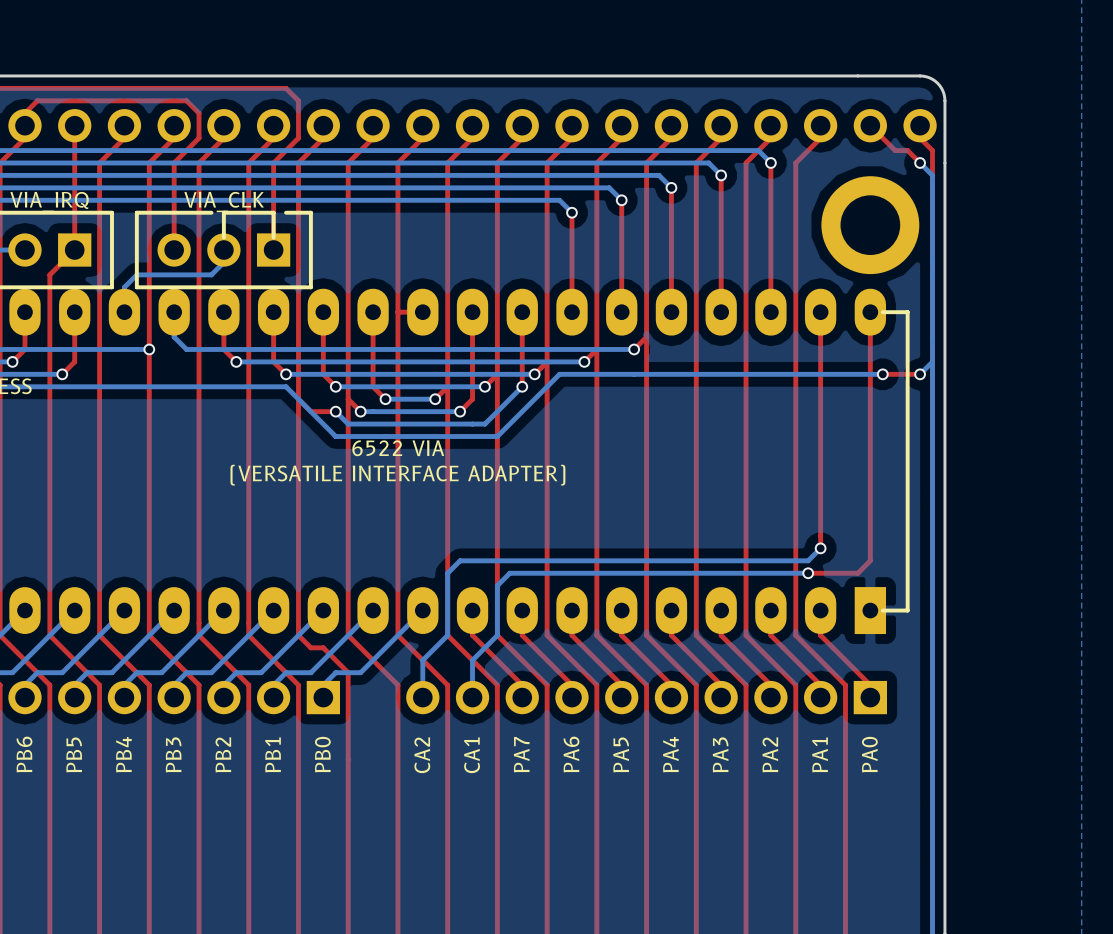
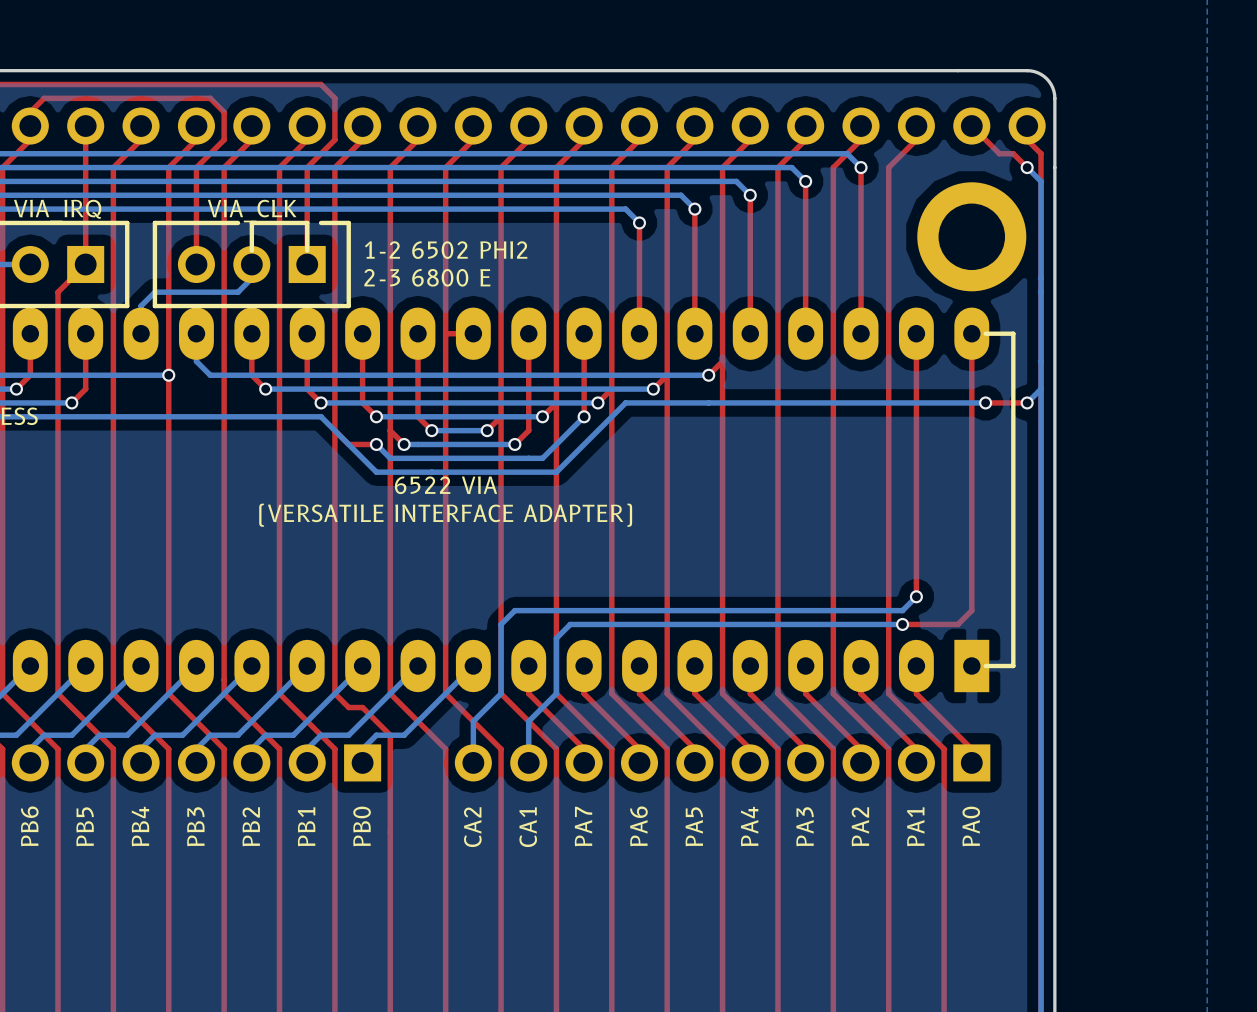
text: none -> 1-2 6502 PHI2 (446, 250)
text: none -> 2-3 6800 E (427, 277)

